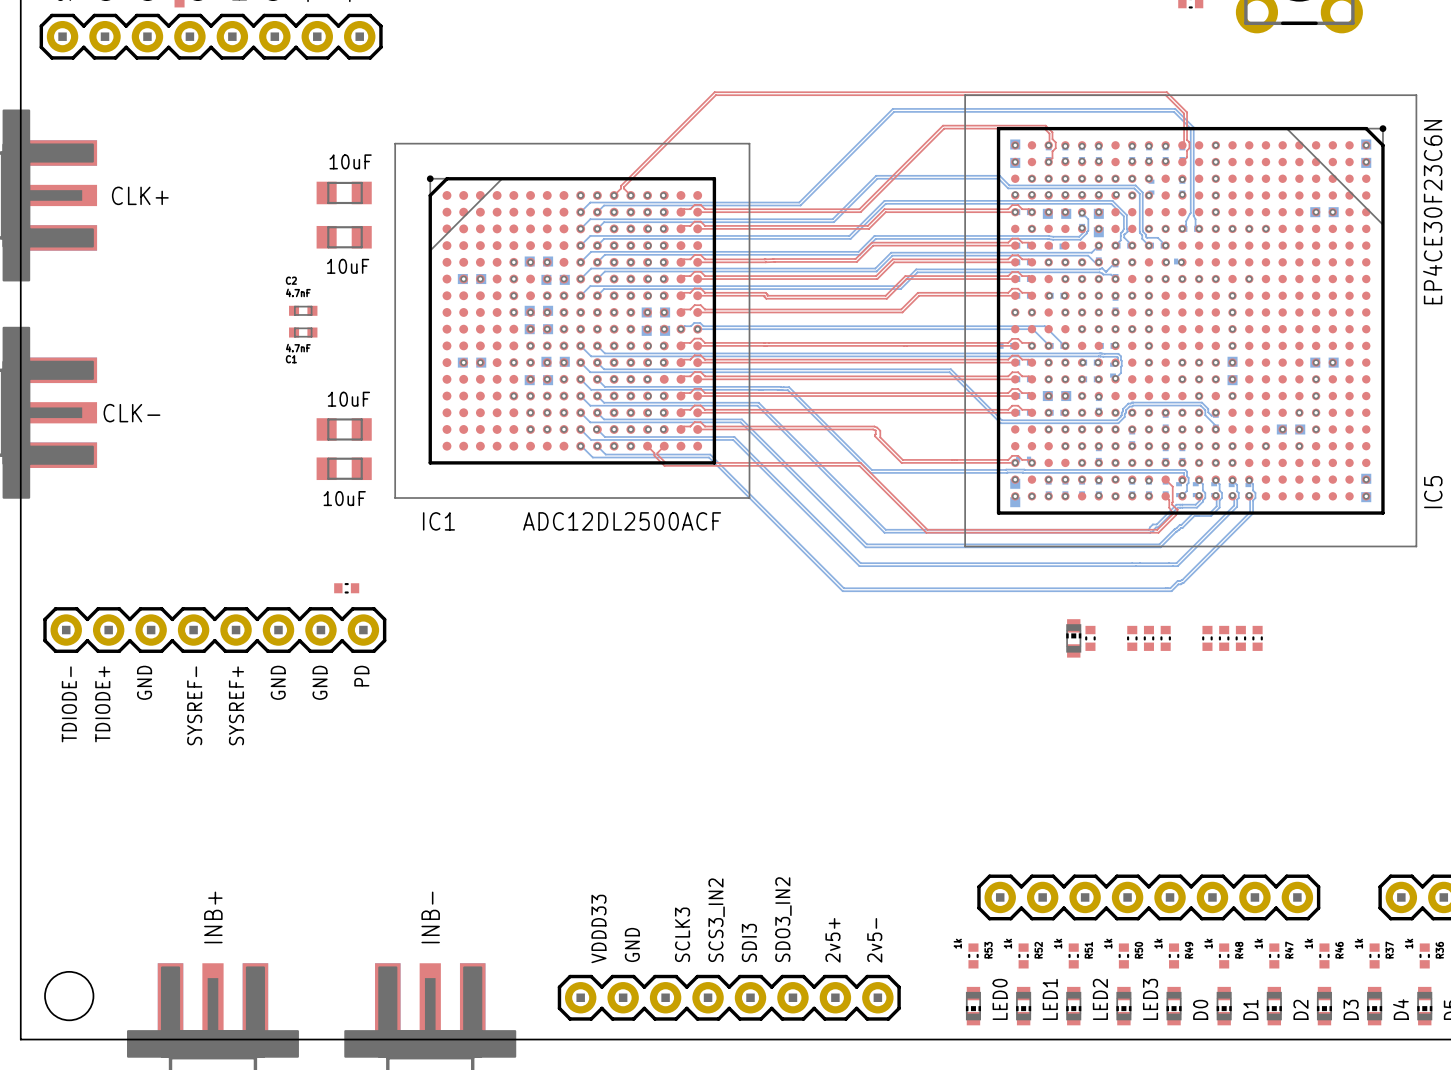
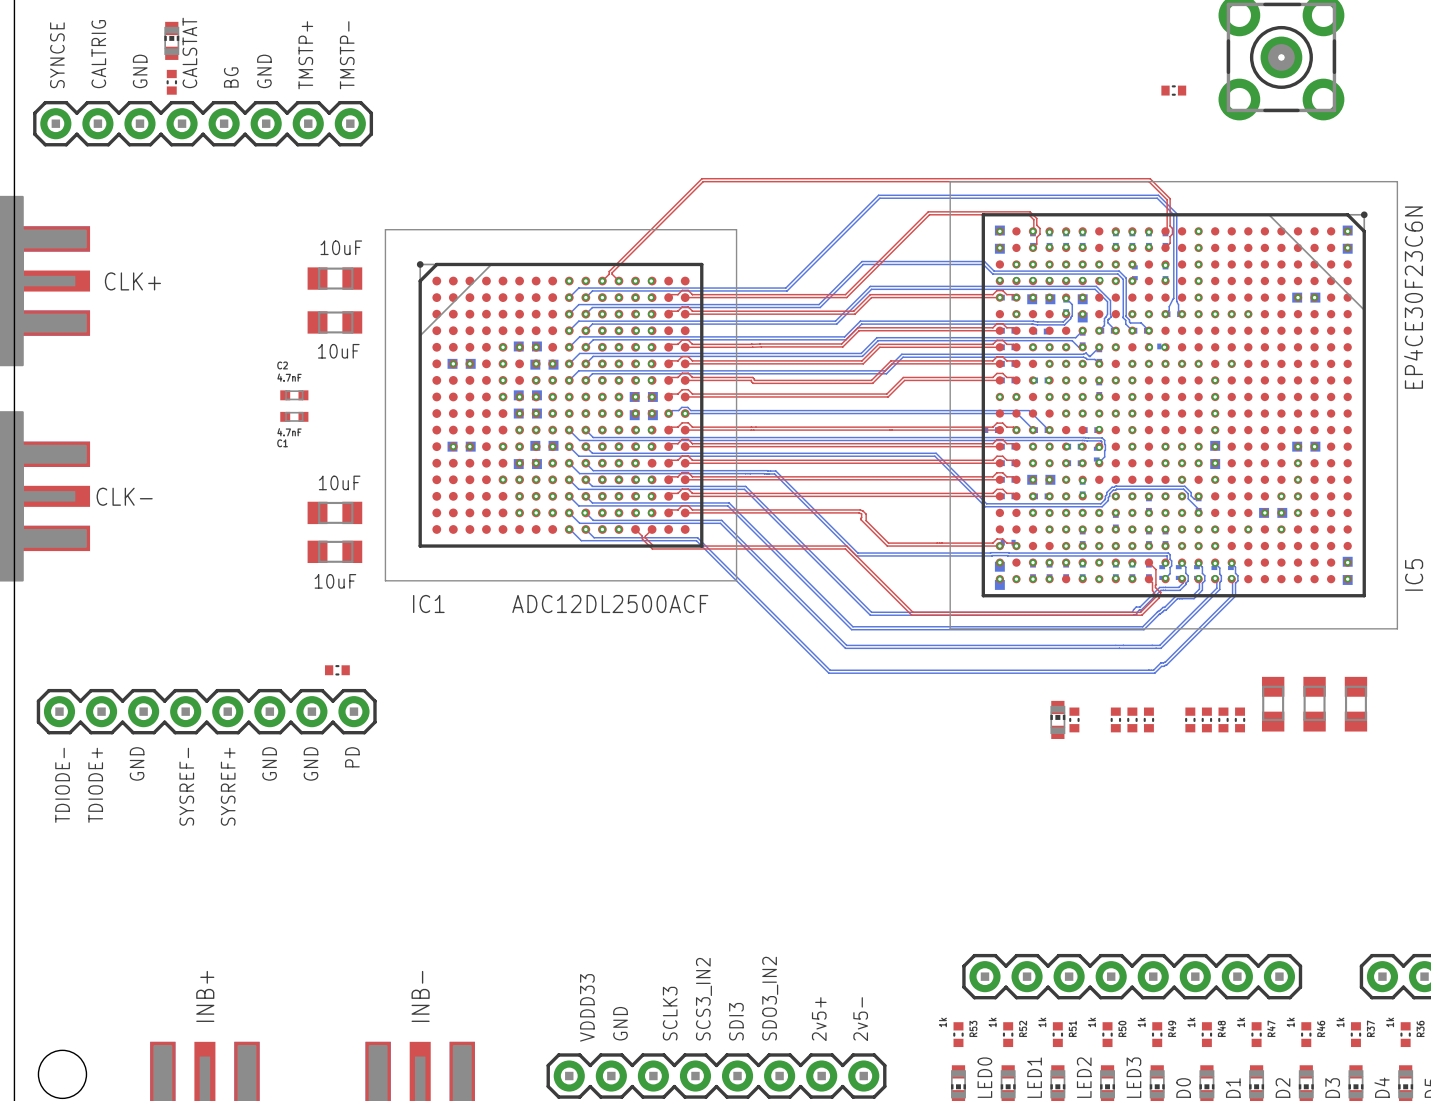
part: none -> (1273, 704)
part: none -> (1314, 704)
part: none -> (1355, 704)

